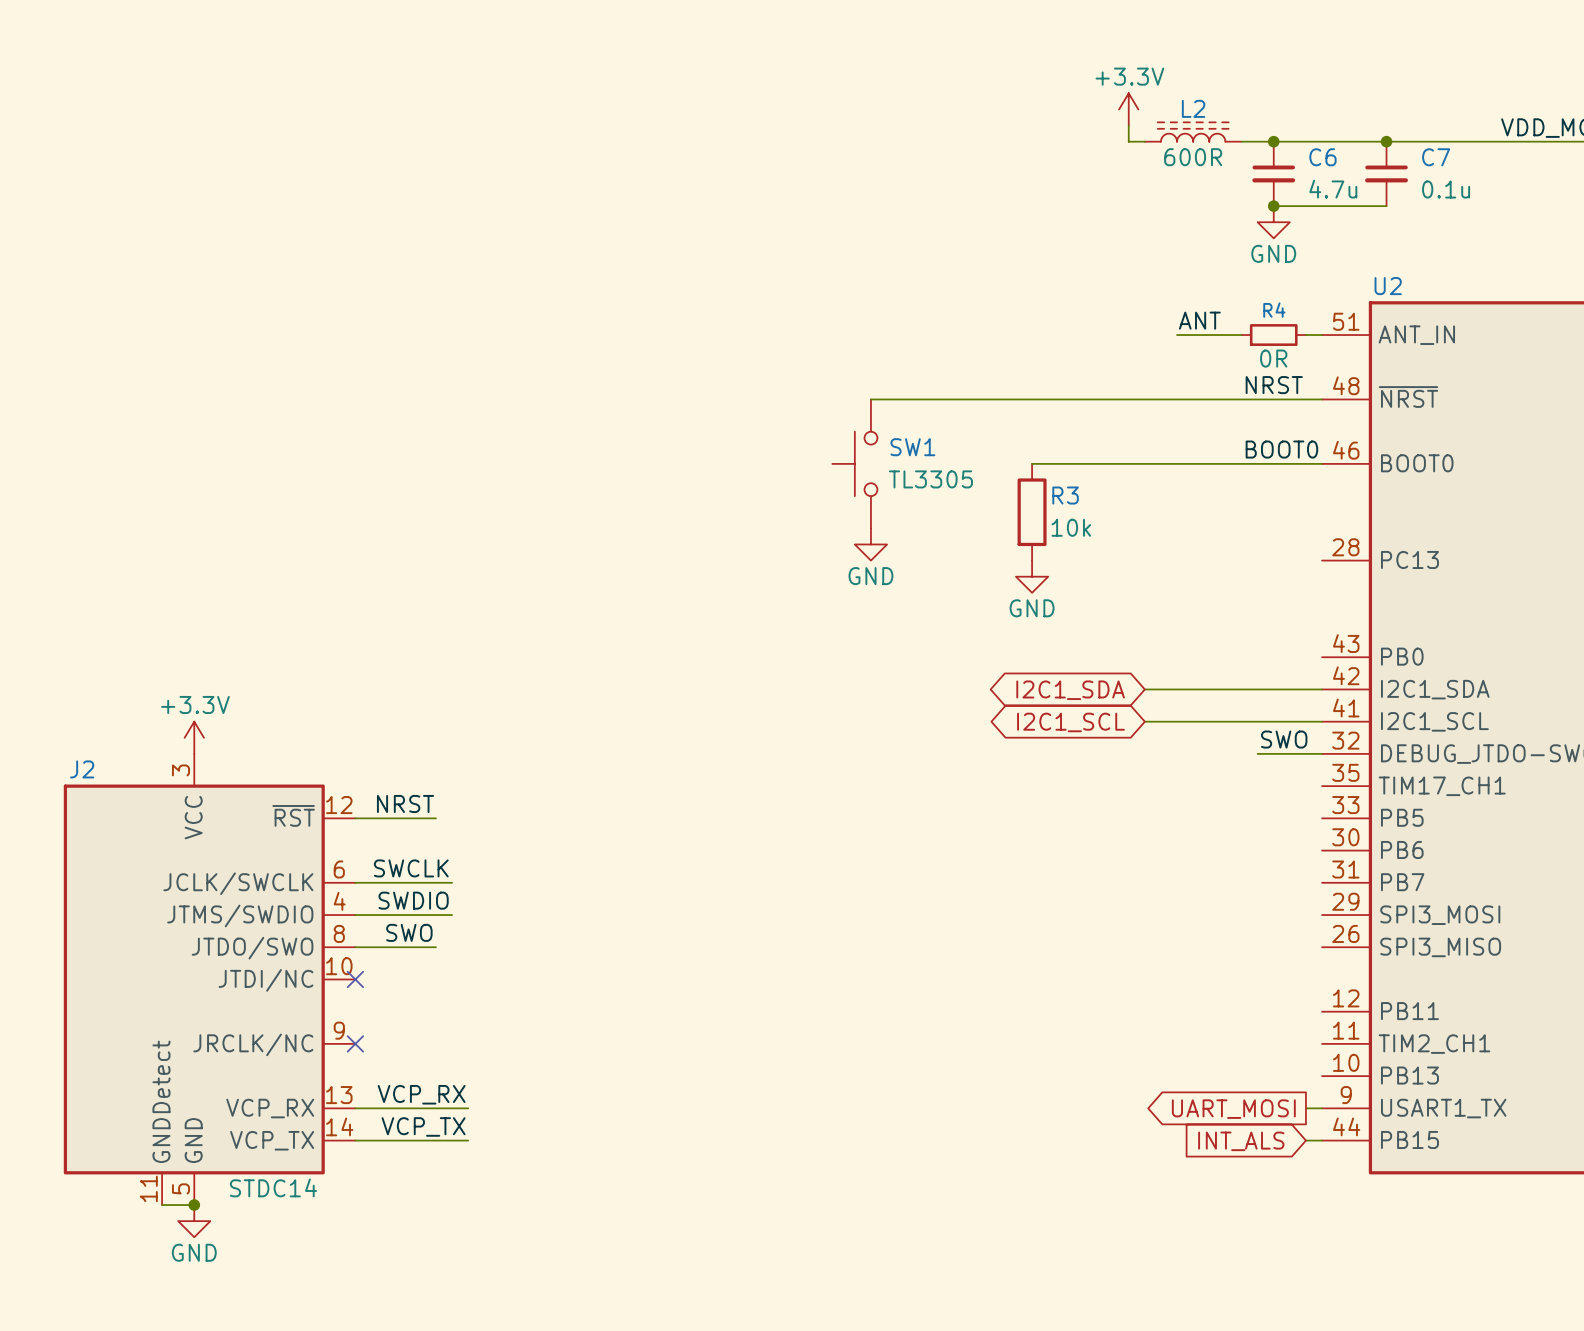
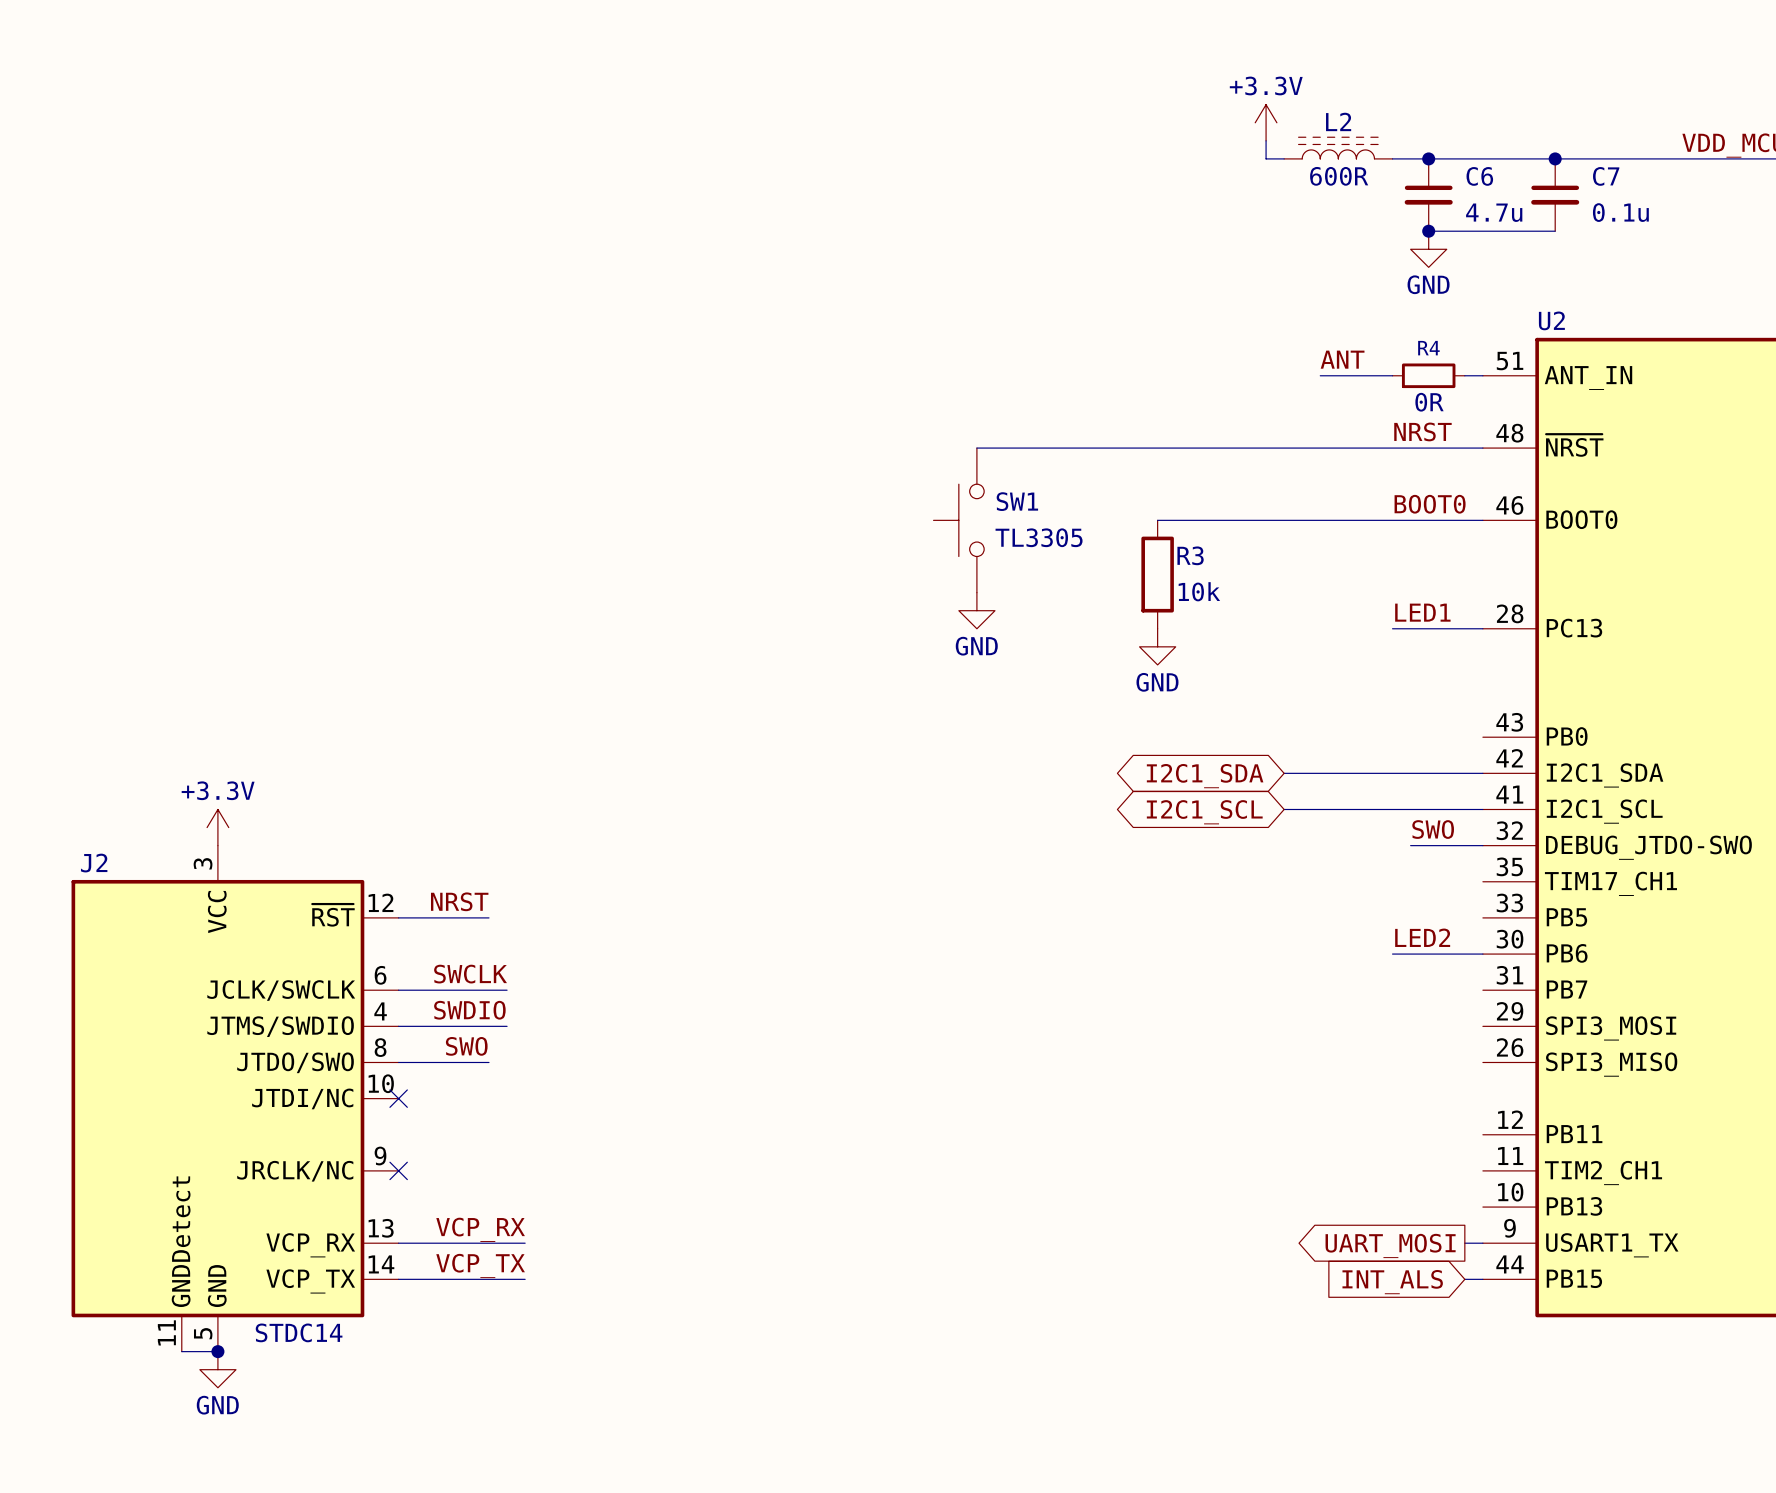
label: none -> LED1 (1422, 612)
wire: none -> (1392, 628) (1482, 628)
label: none -> LED2 (1422, 937)
wire: none -> (1392, 954) (1482, 954)

